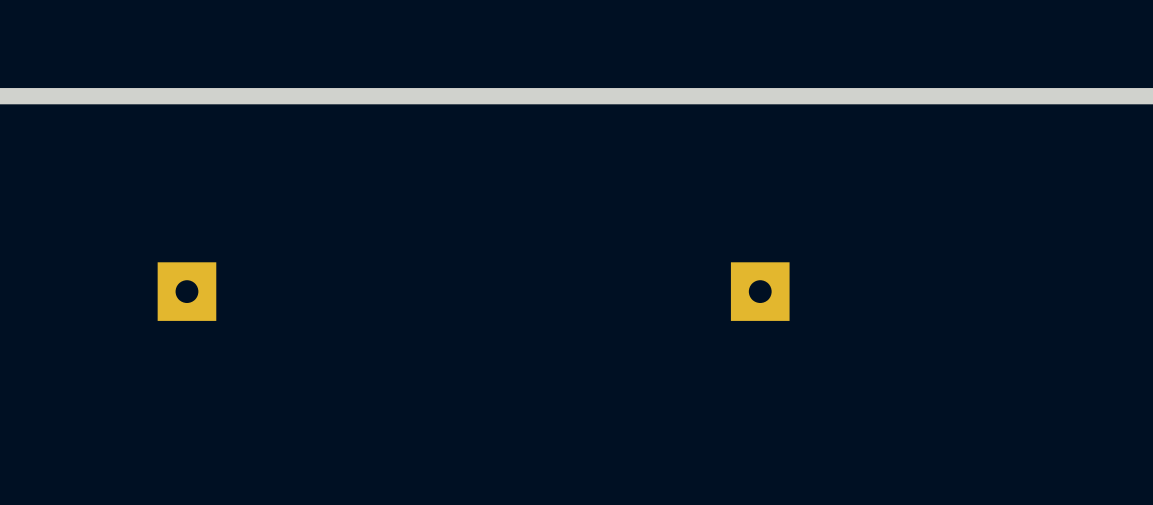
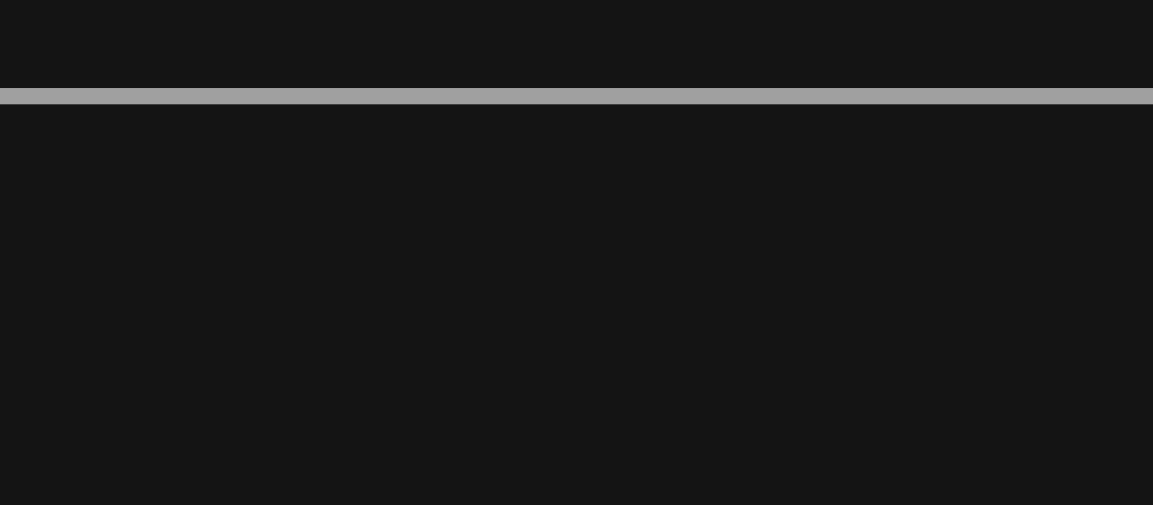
part: (186, 291) -> none
part: (760, 291) -> none

